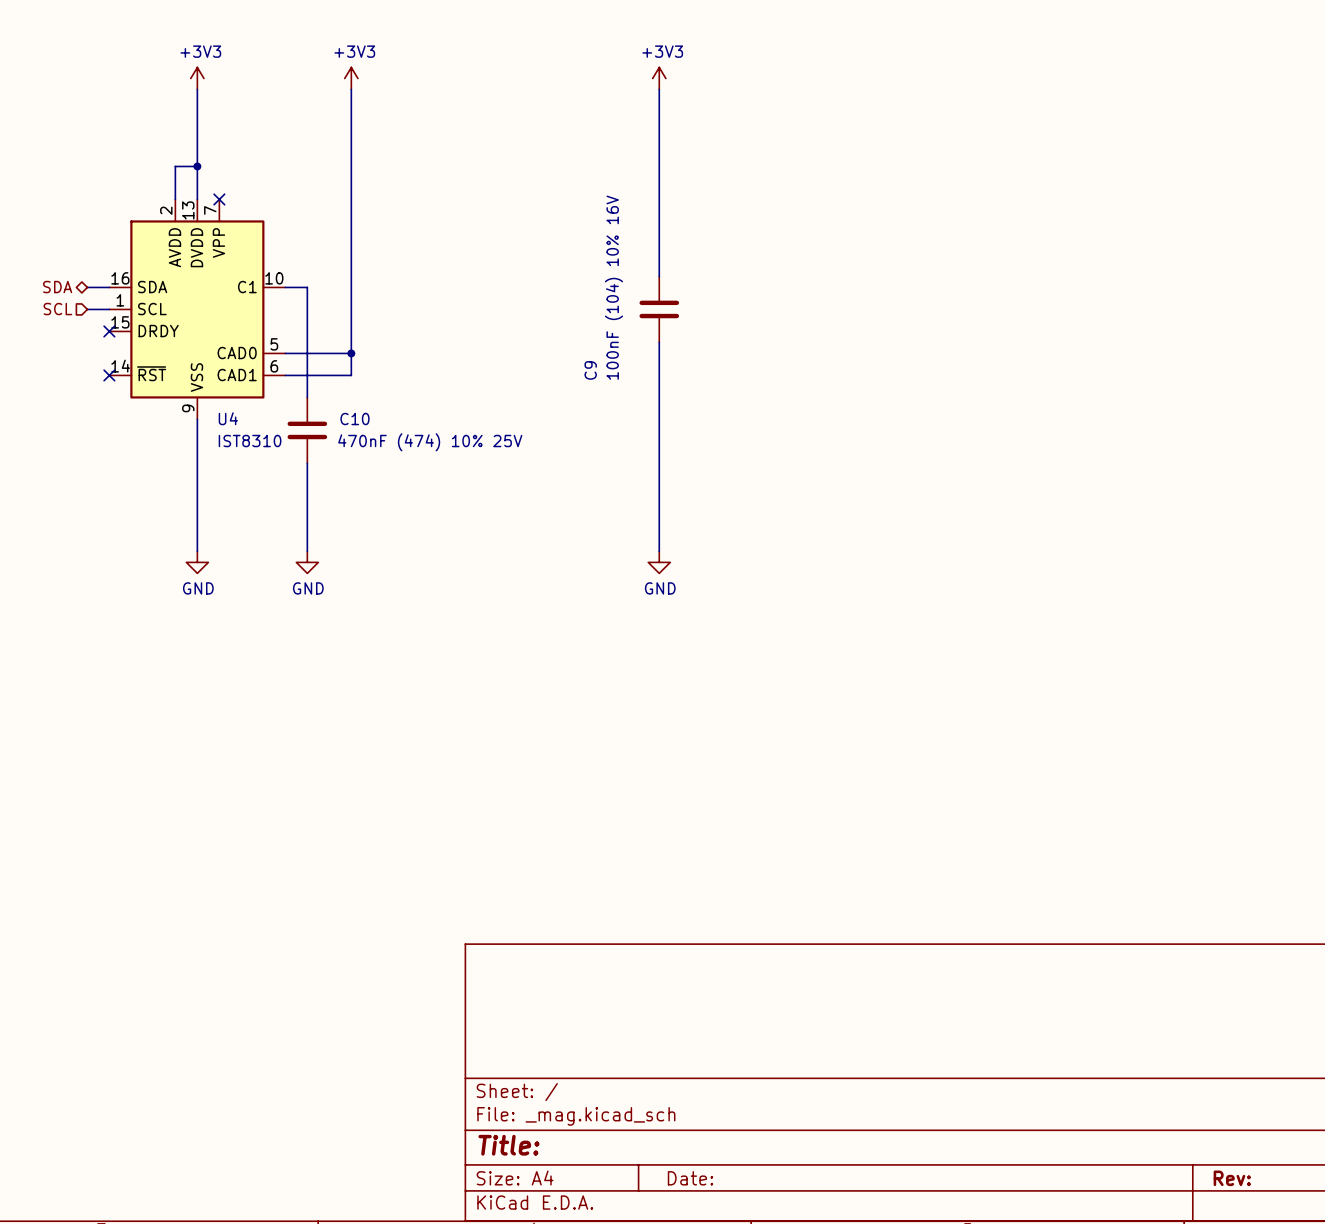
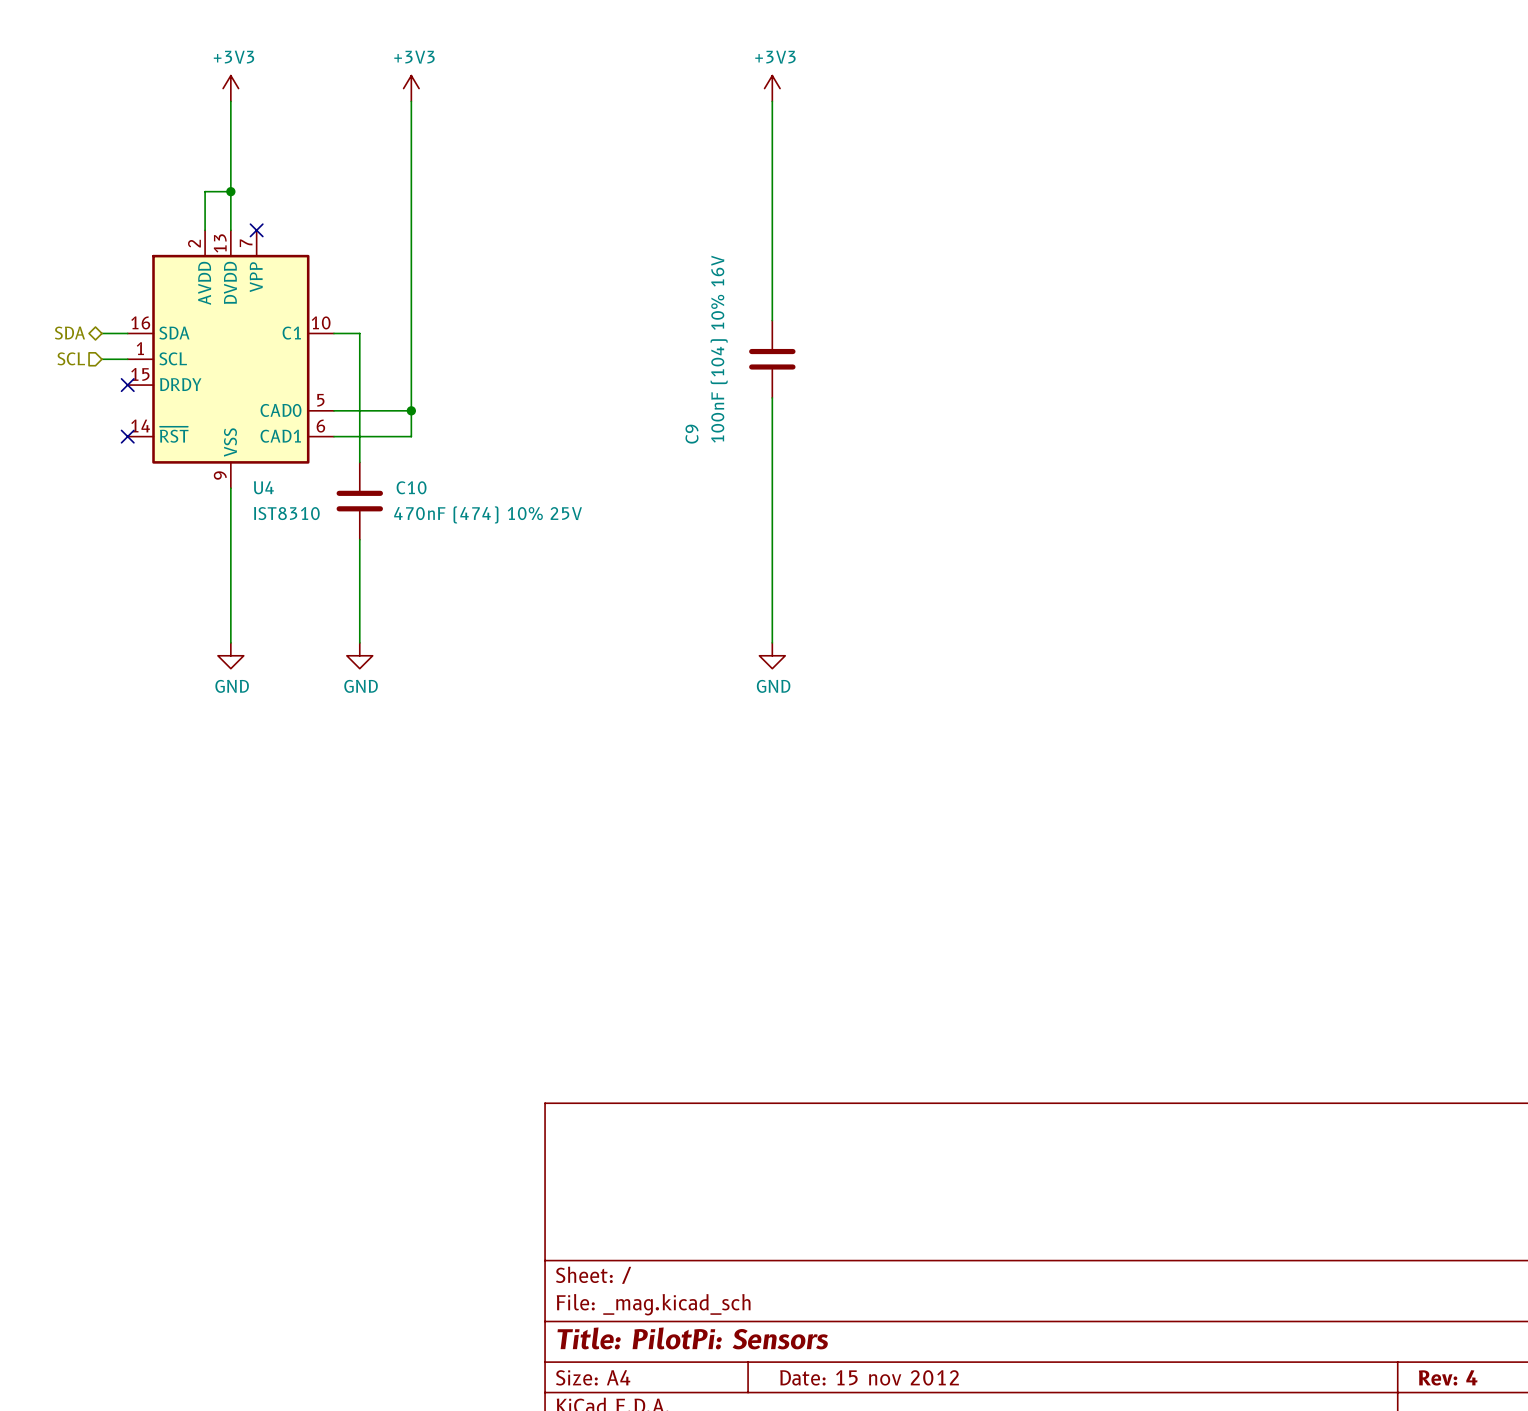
title block: Title: (508, 1145) -> Title: PilotPi: Sensors (692, 1338)
title block: Date: (690, 1178) -> Date: 15 nov 2012 (869, 1377)
title block: Rev: (1232, 1178) -> Rev: 4 (1448, 1377)

